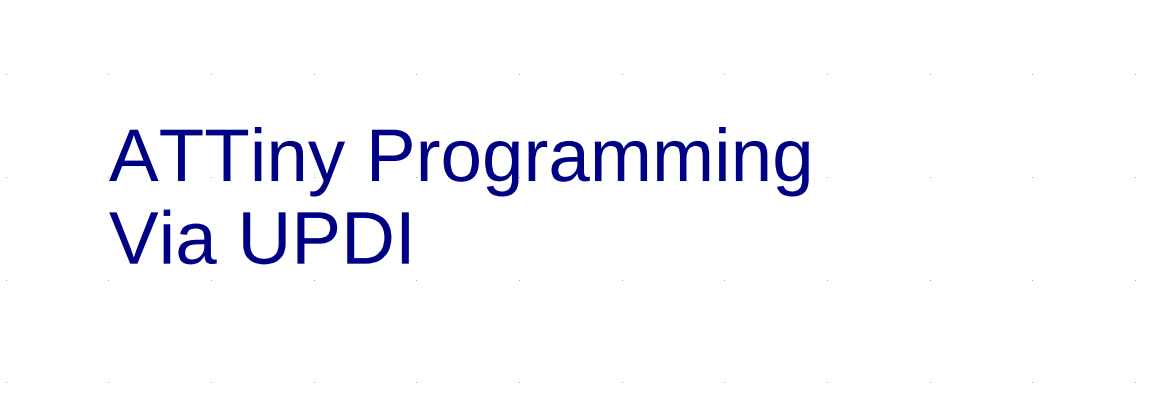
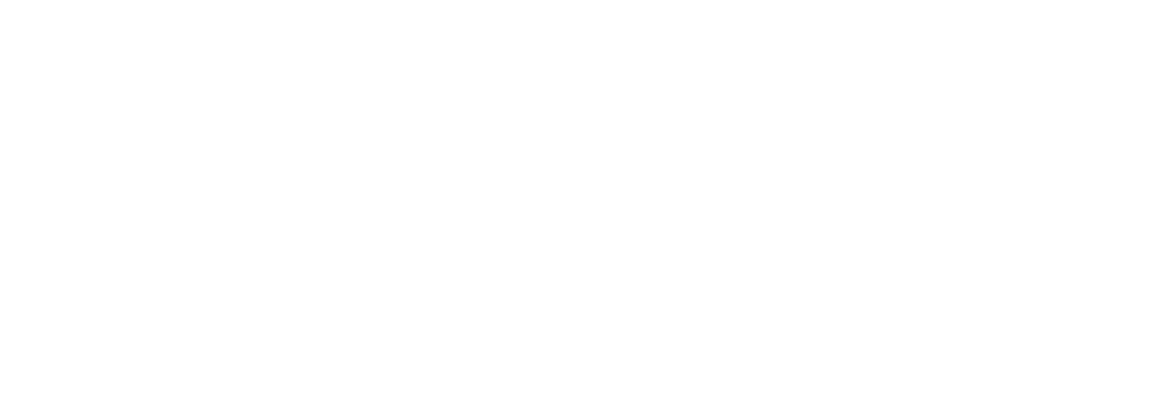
text: ATTiny Programming (458, 161) -> none
text: Via UPDI (259, 237) -> none

